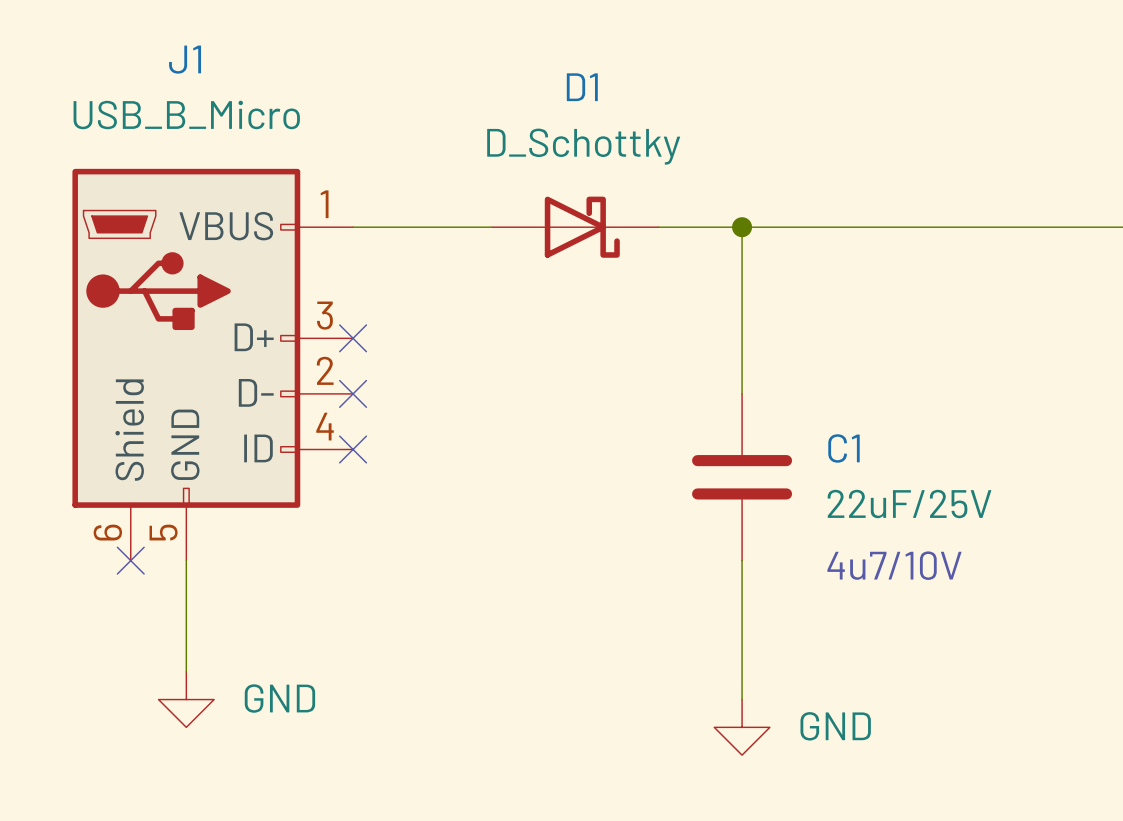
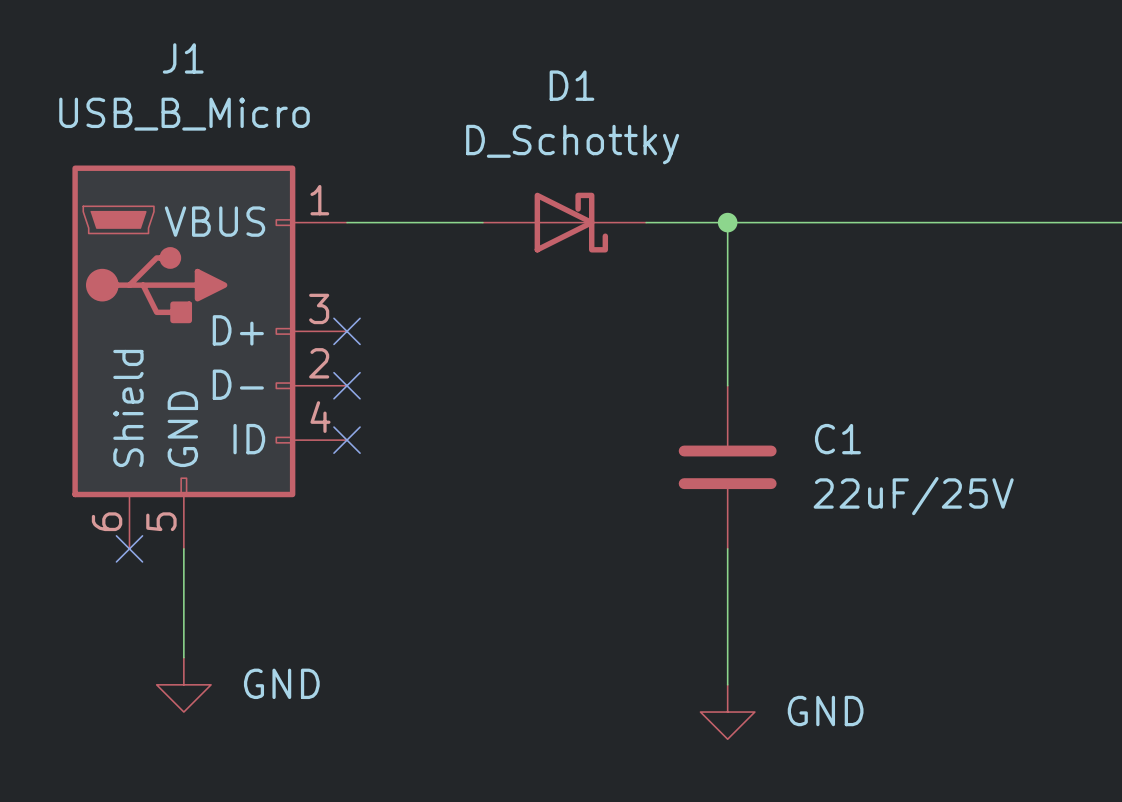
text: 4u7/10V (894, 565) -> none

